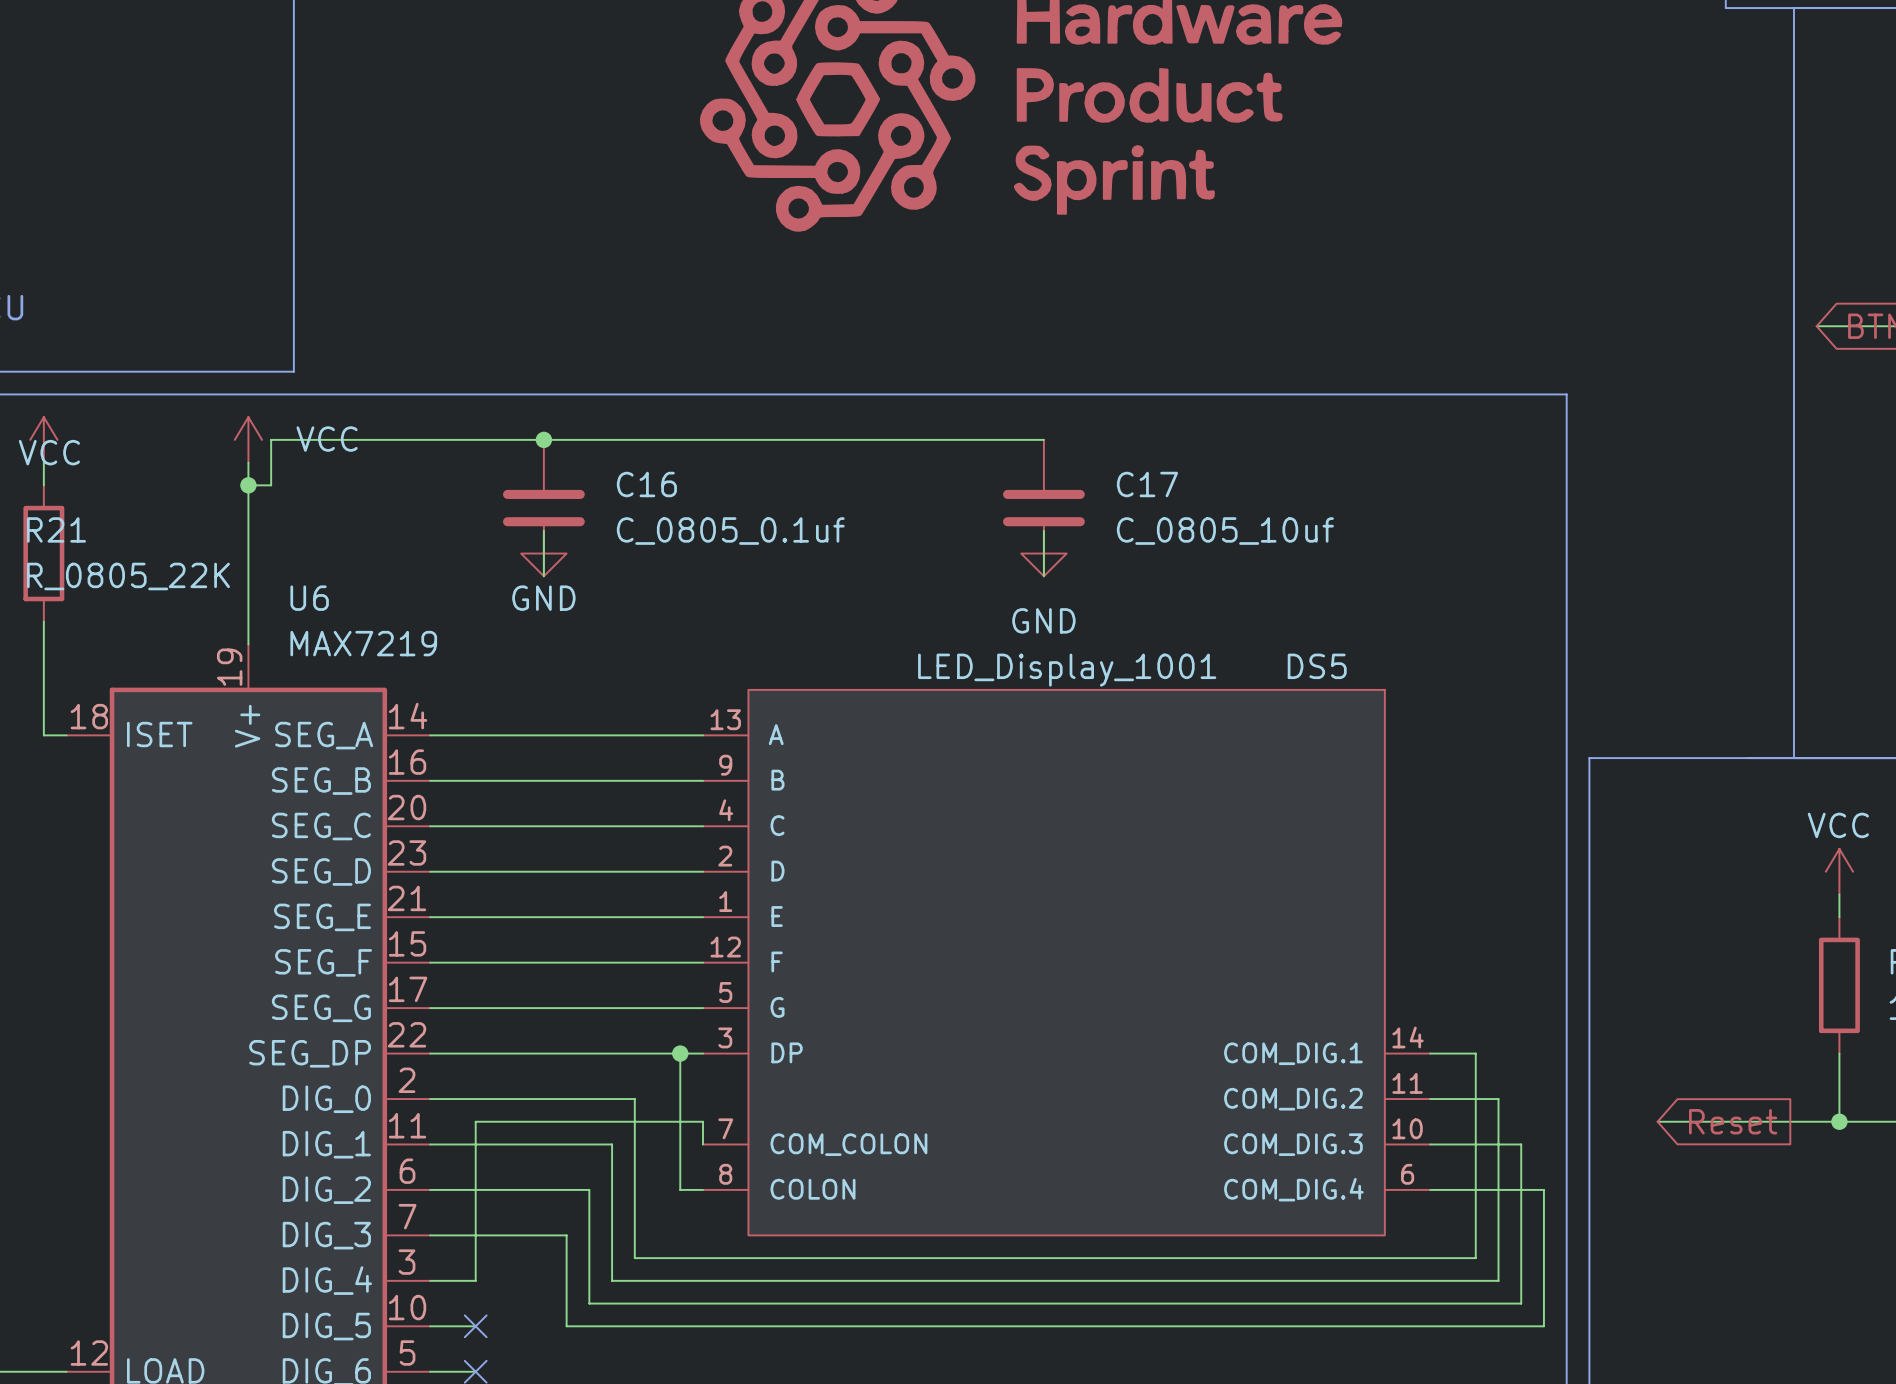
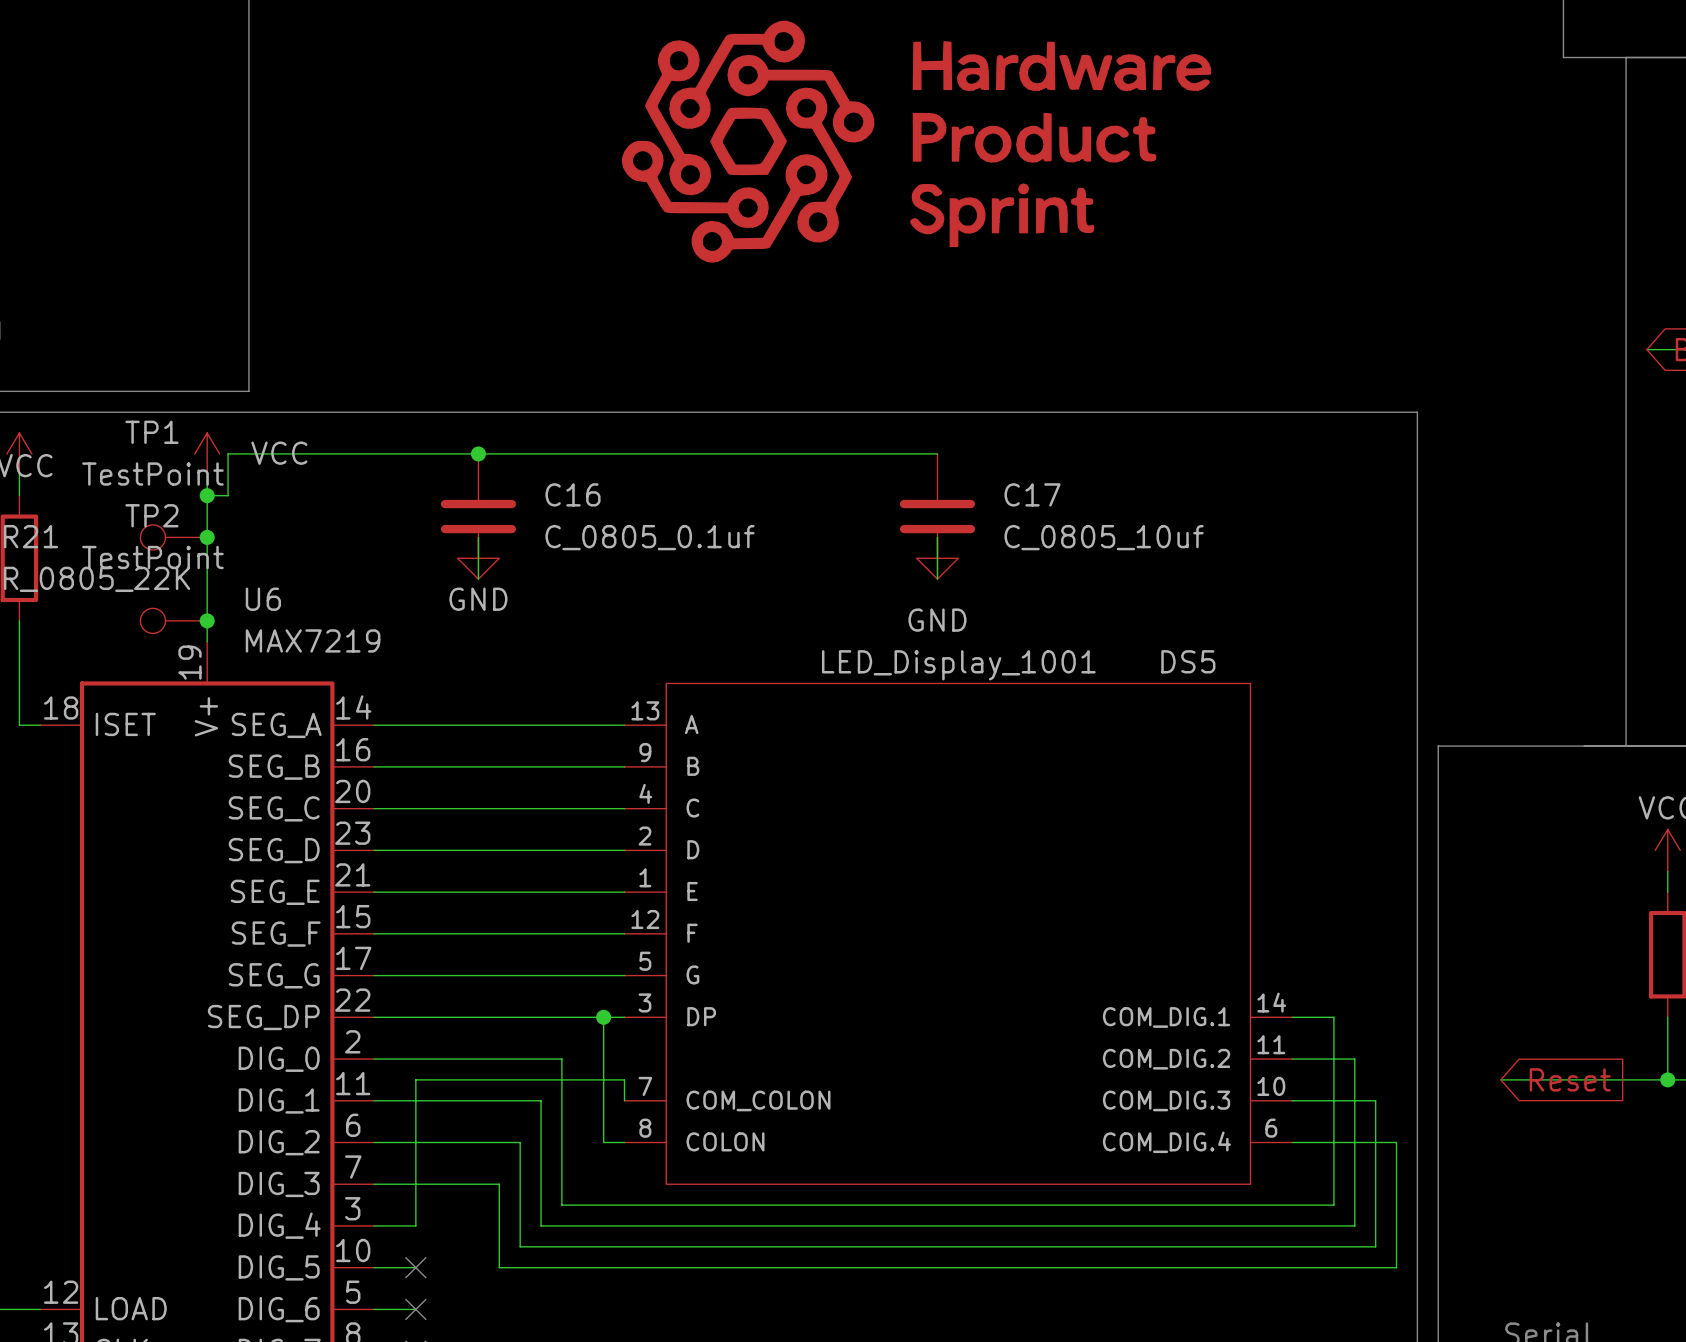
TP1: none -> TestPoint (173, 537)
junction: none -> (207, 537)
TP2: none -> TestPoint (173, 620)
junction: none -> (207, 620)

